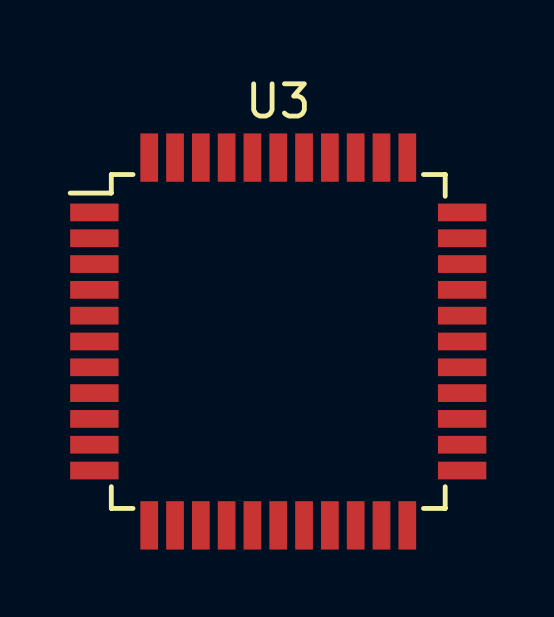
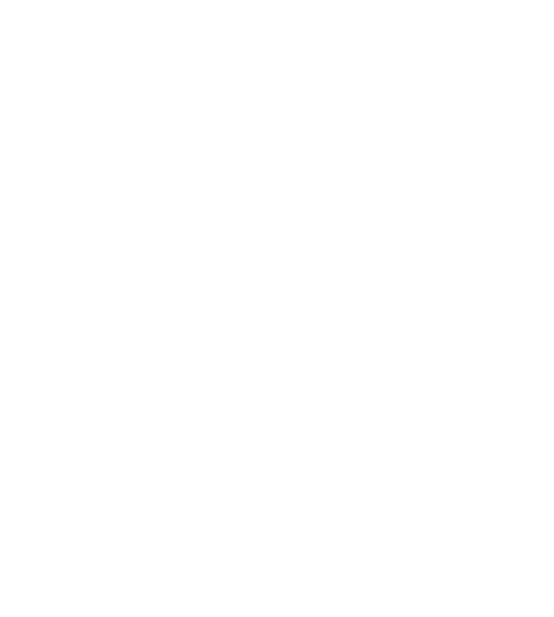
U3: (277, 341) -> none

